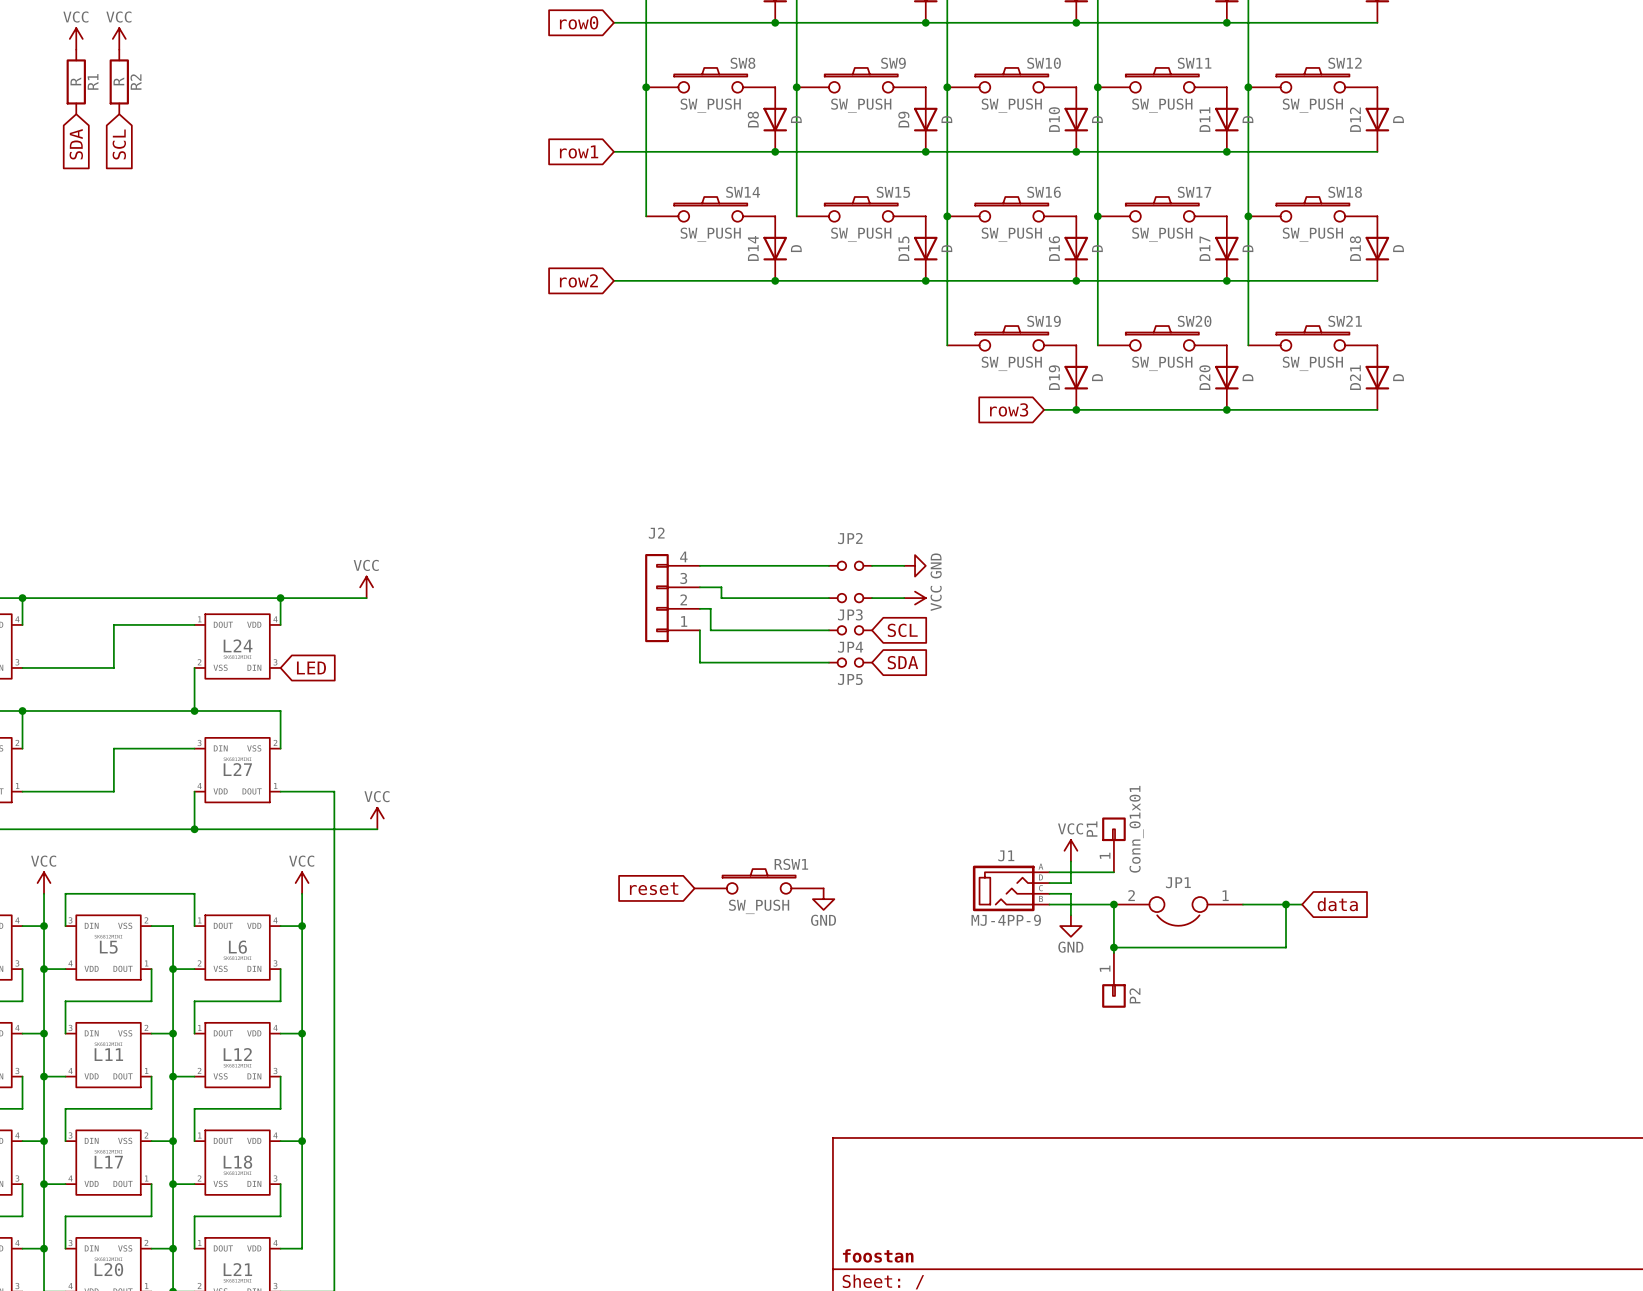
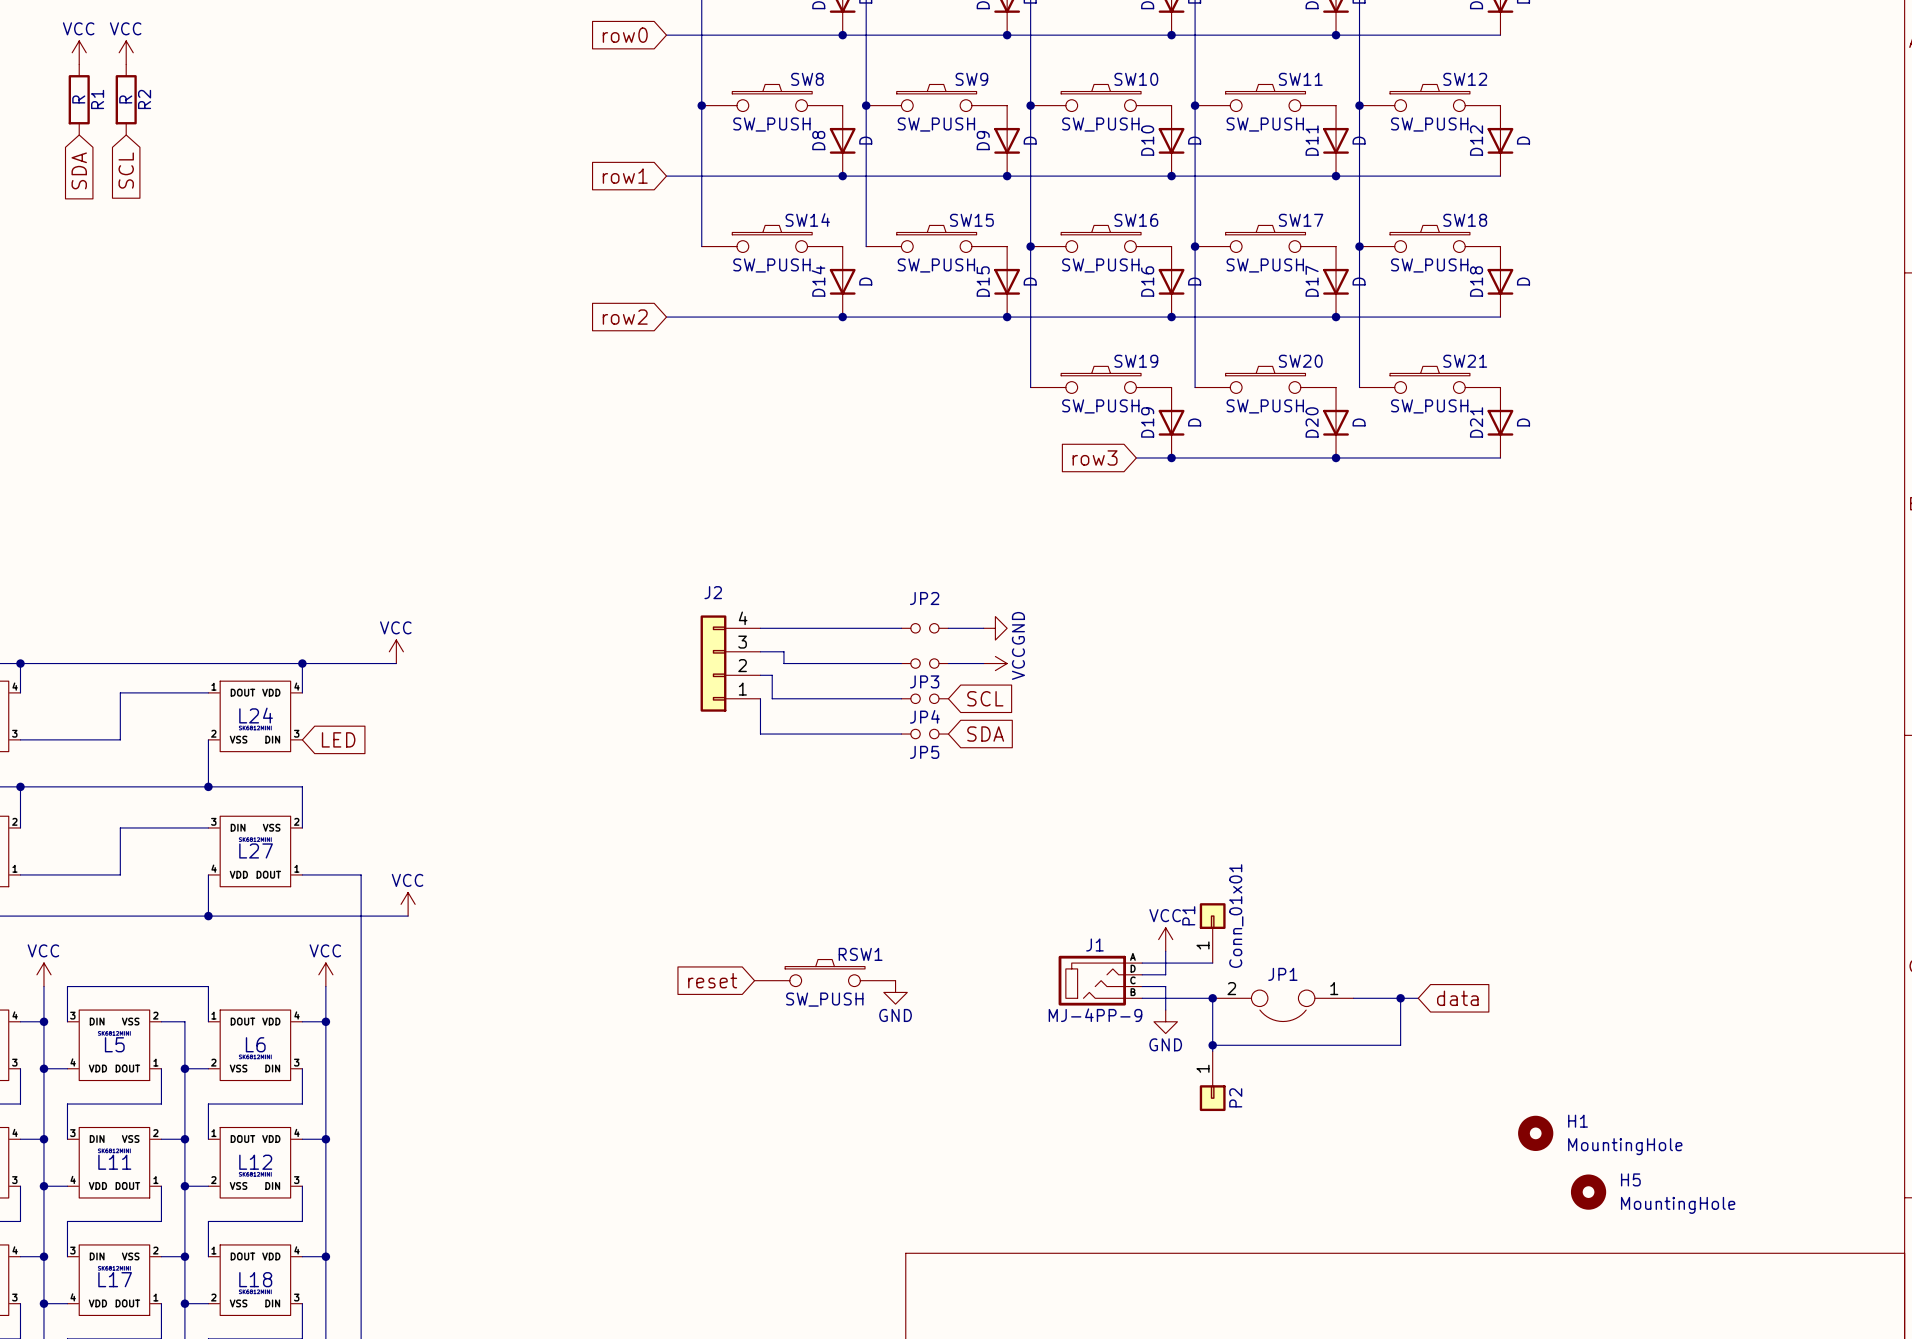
H1: none -> MountingHole (1535, 1133)
H5: none -> MountingHole (1588, 1192)

